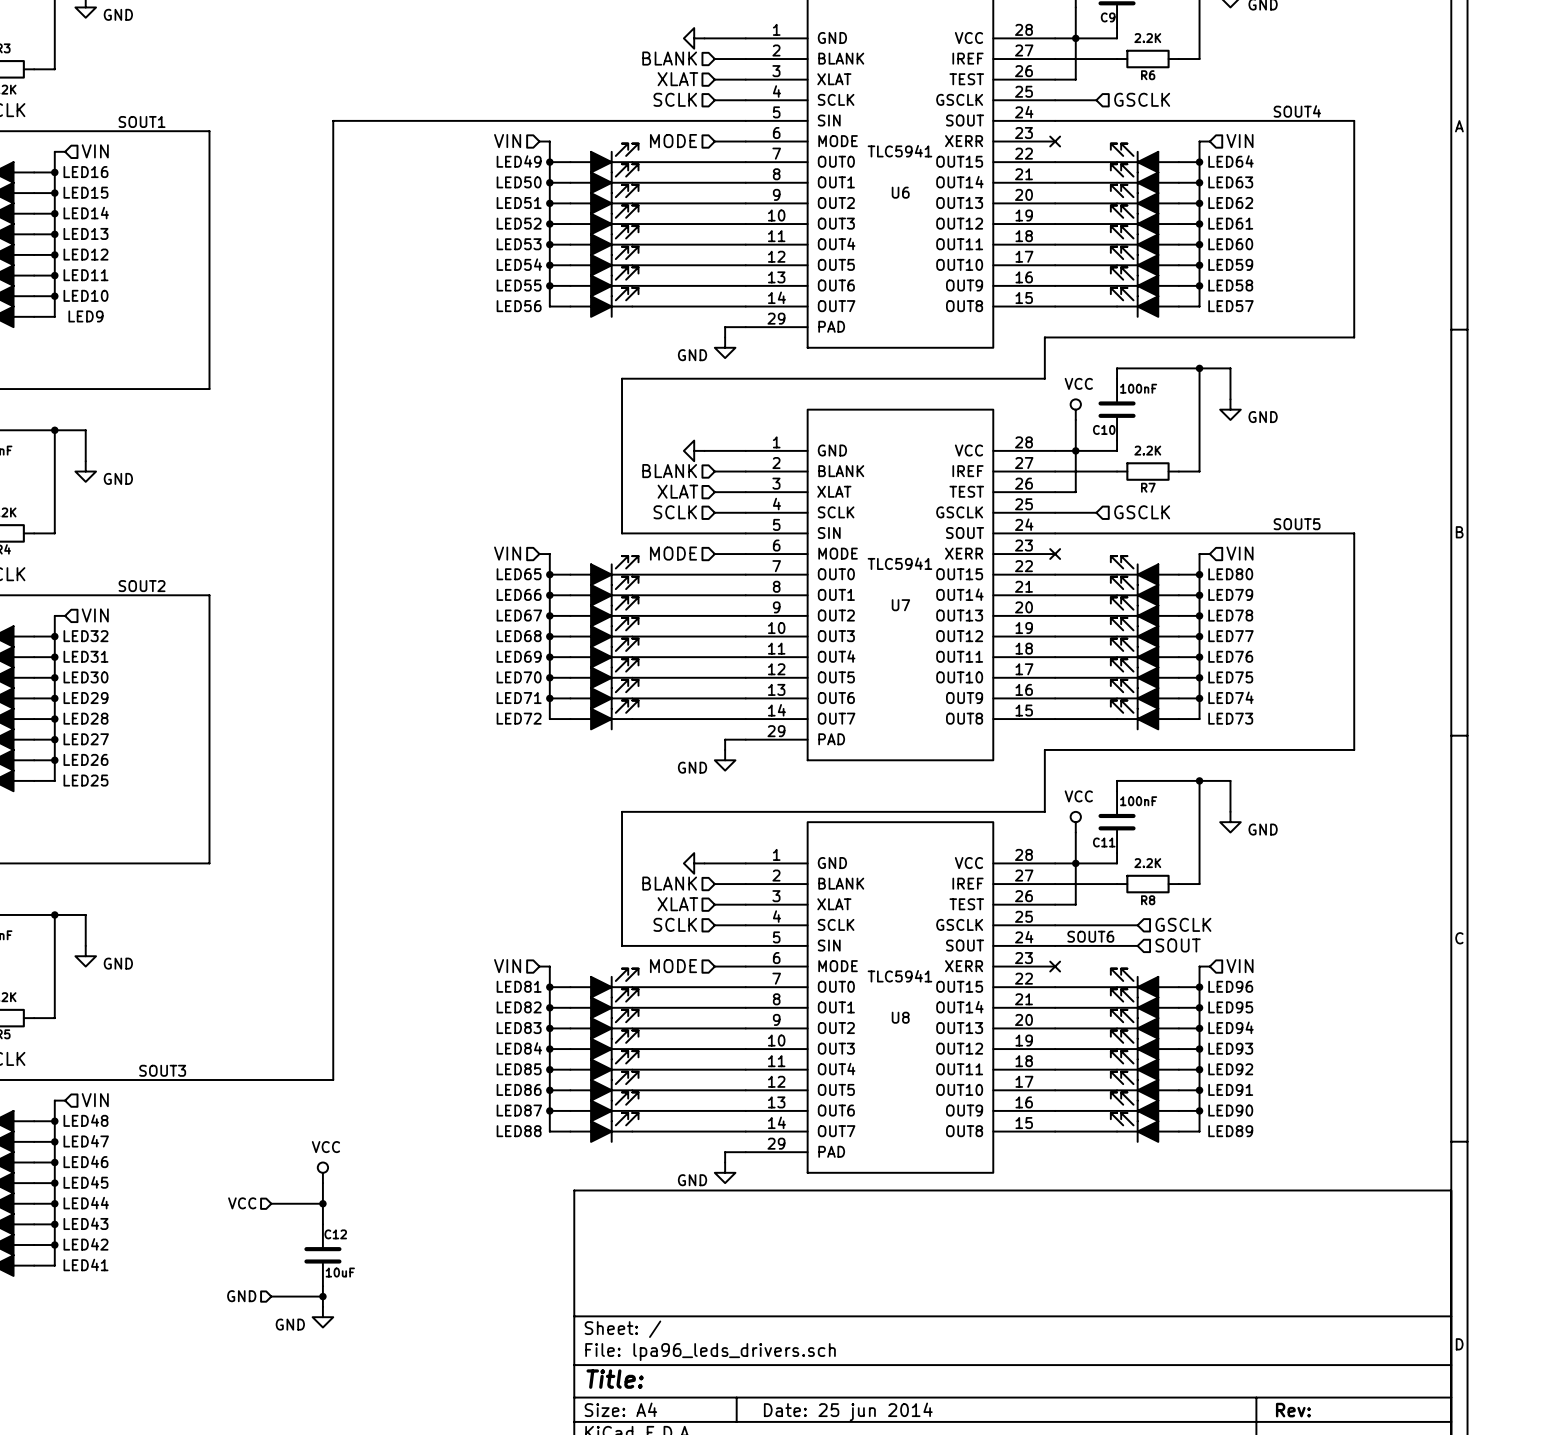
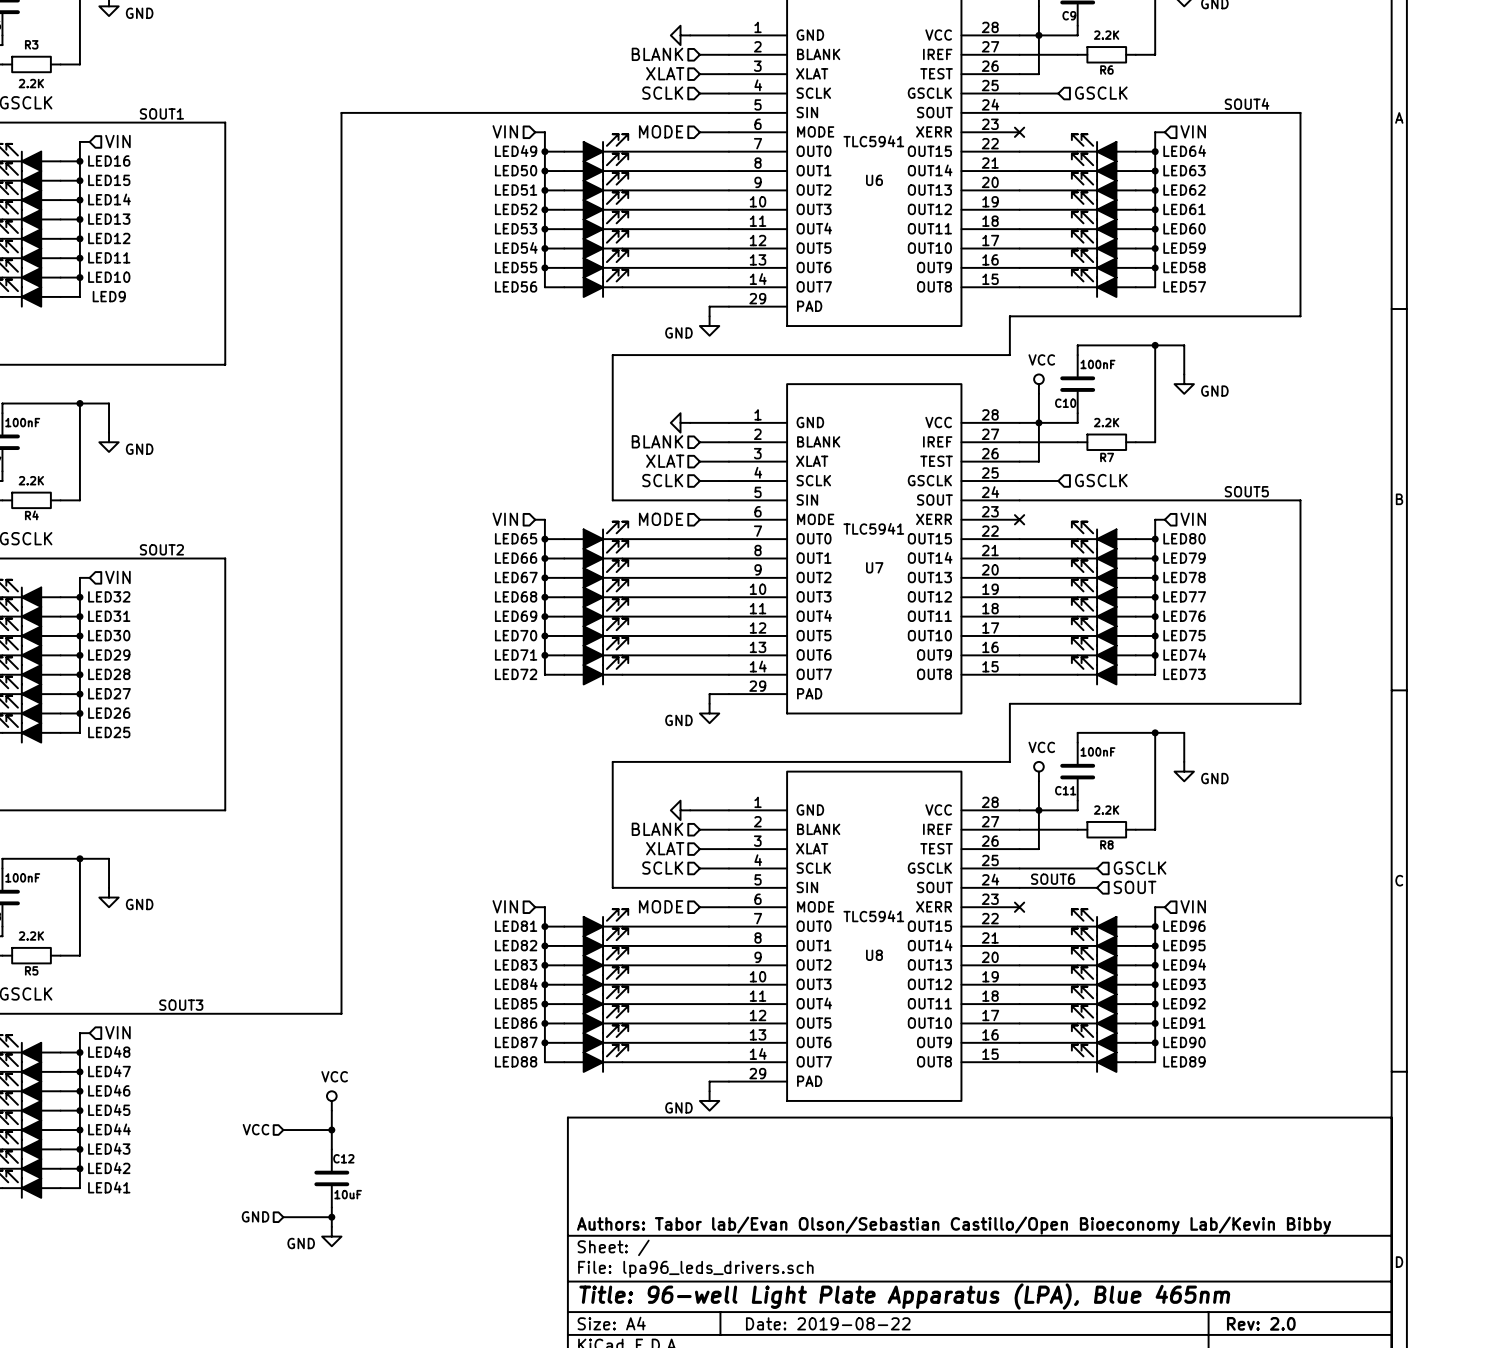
title block: none -> Authors: Tabor lab/Evan Olson/Sebastian Castillo/Open Bioeconomy Lab/Kevin Bibby (954, 1225)
title block: Title: (615, 1379) -> Title: 96-well Light Plate Apparatus (LPA), Blue 465nm (904, 1296)
title block: Rev: (1293, 1410) -> Rev: 2.0 (1261, 1323)
title block: Date: 25 jun 2014 (848, 1411) -> Date: 2019-08-22 (828, 1323)

